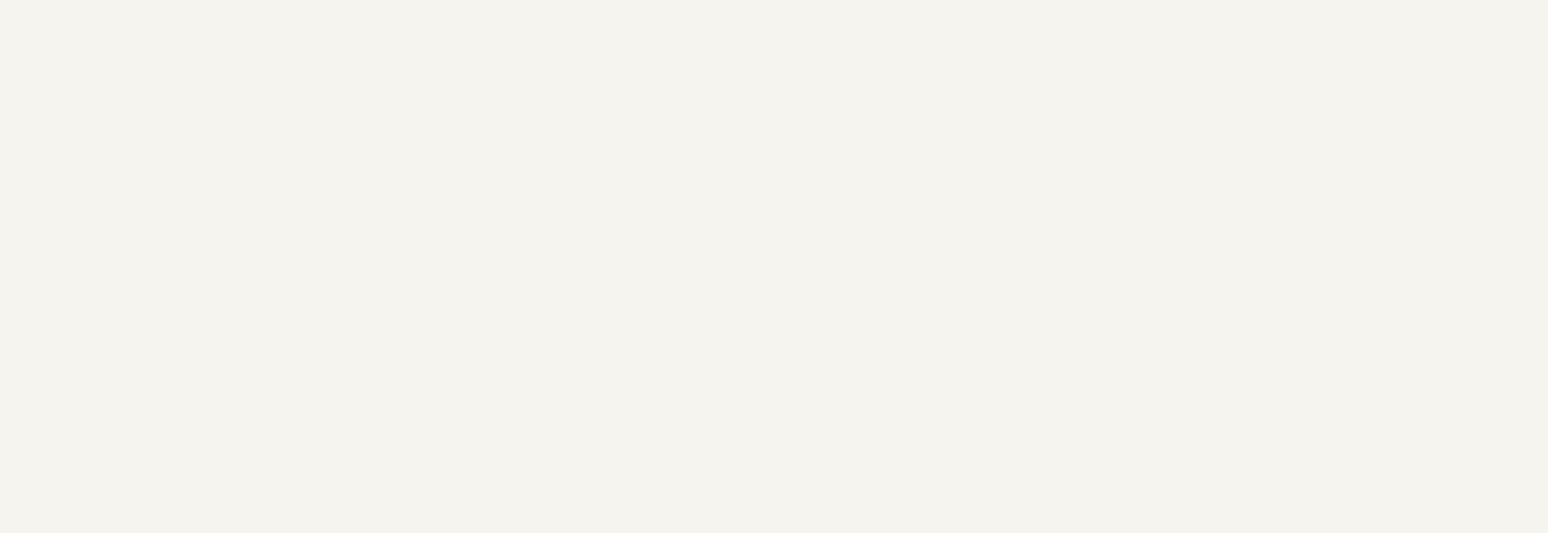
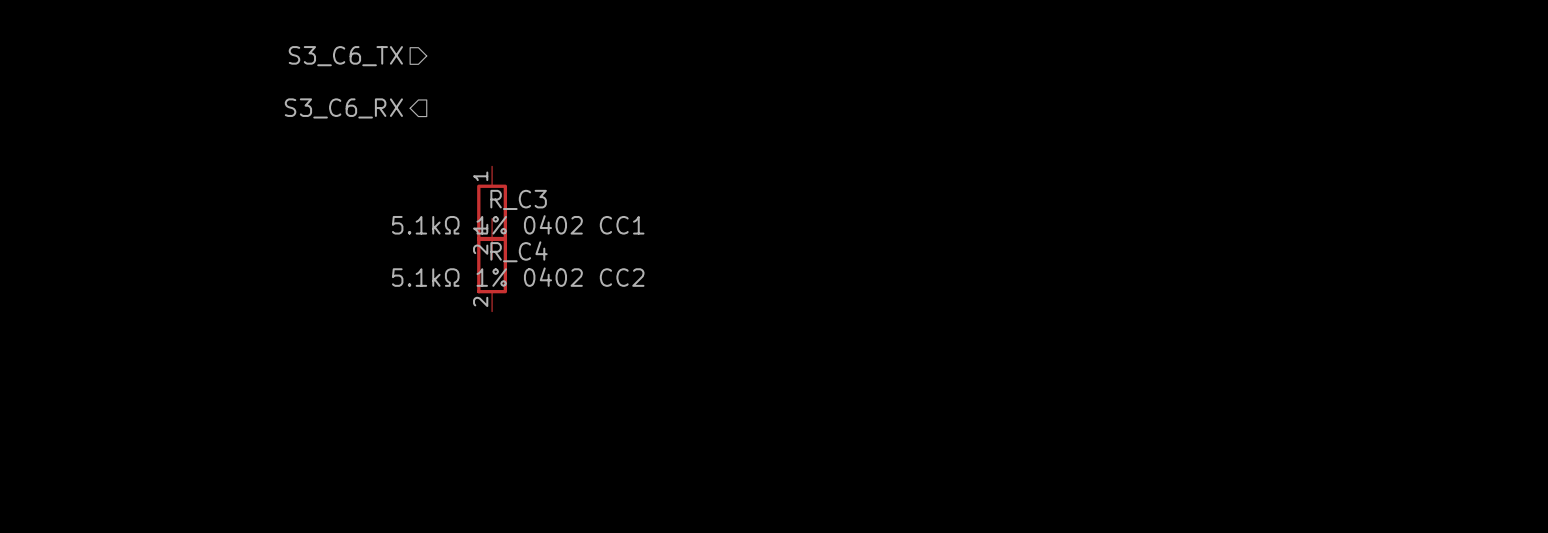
hierarchical label: none -> S3_C6_TX (345, 56)
hierarchical label: none -> S3_C6_RX (343, 108)
R_C3: none -> 5.1kΩ 1% 0402 CC1 (492, 212)
R_C4: none -> 5.1kΩ 1% 0402 CC2 (492, 265)

